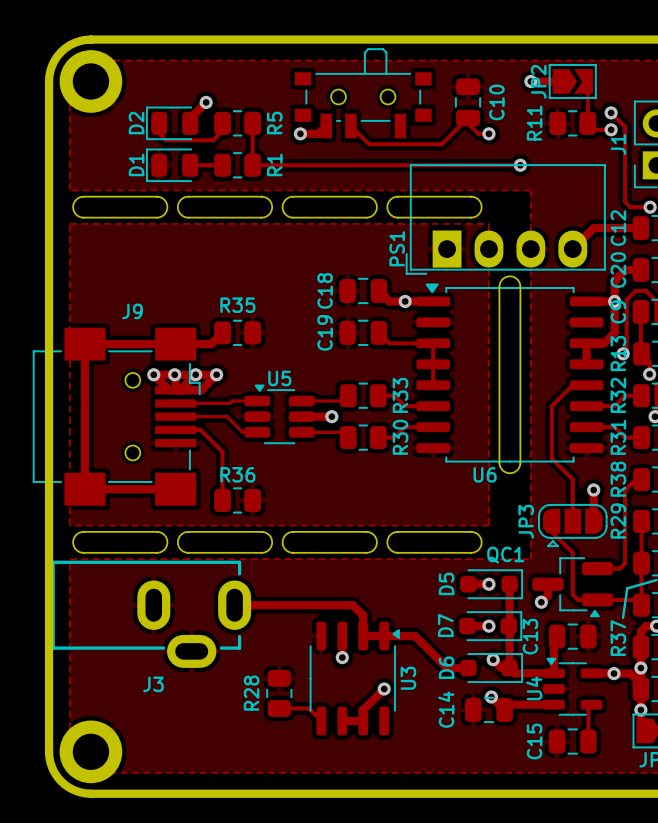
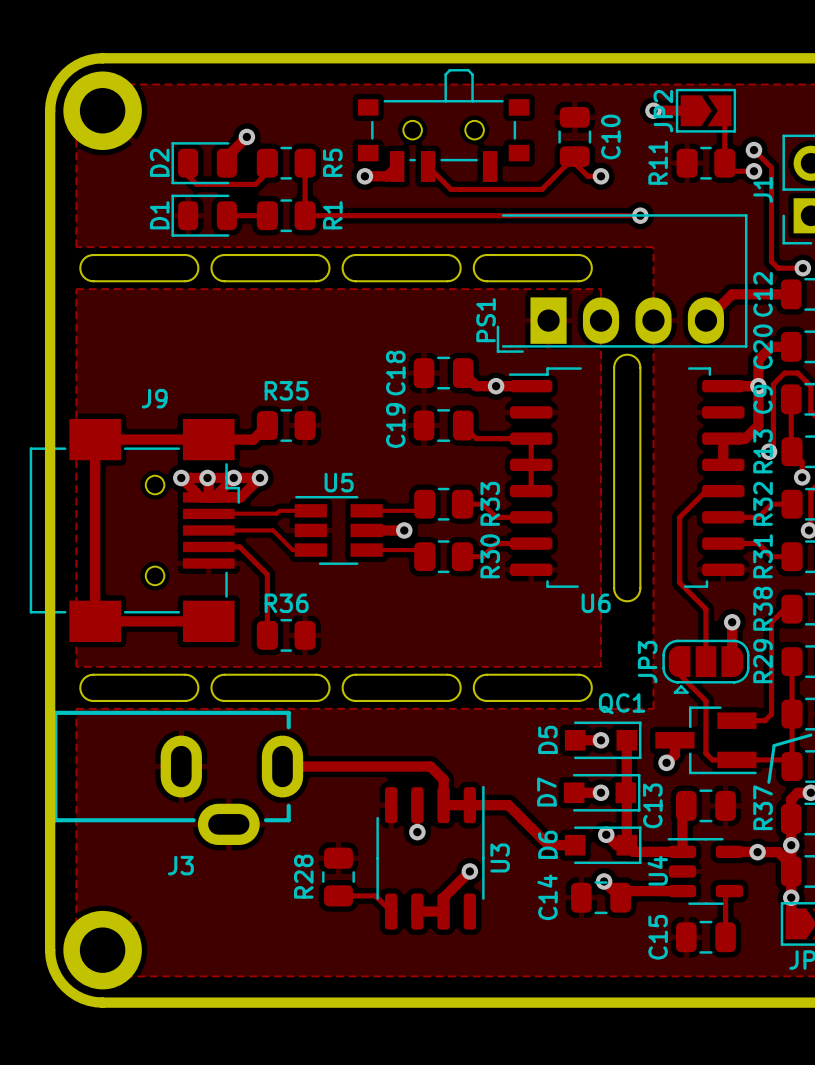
PS1 footprint: [405, 164, 606, 275] -> [496, 214, 748, 353]
U6 footprint: [416, 283, 604, 463] -> [508, 367, 745, 588]
U5 footprint: [244, 384, 315, 445] -> [294, 495, 383, 565]
QC1 footprint: [532, 557, 614, 618] -> [655, 706, 757, 775]
D5 footprint: [460, 569, 524, 600] -> [564, 721, 642, 760]
D7 footprint: [459, 611, 523, 642] -> [563, 773, 641, 812]
U3 footprint: [309, 621, 400, 736] -> [376, 785, 485, 930]
D6 footprint: [460, 653, 524, 684] -> [564, 826, 642, 865]
U4 footprint: [543, 657, 603, 716] -> [667, 838, 744, 905]

